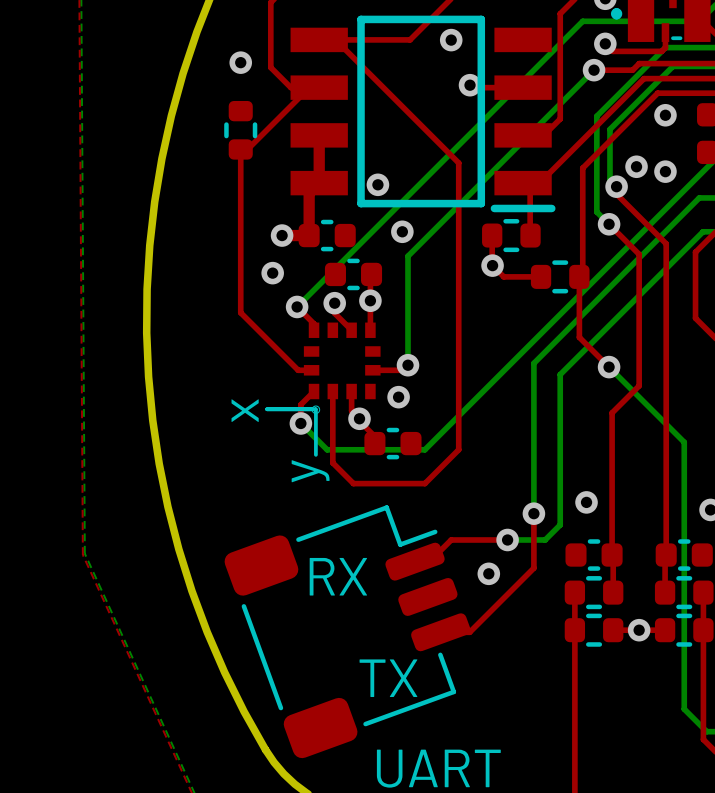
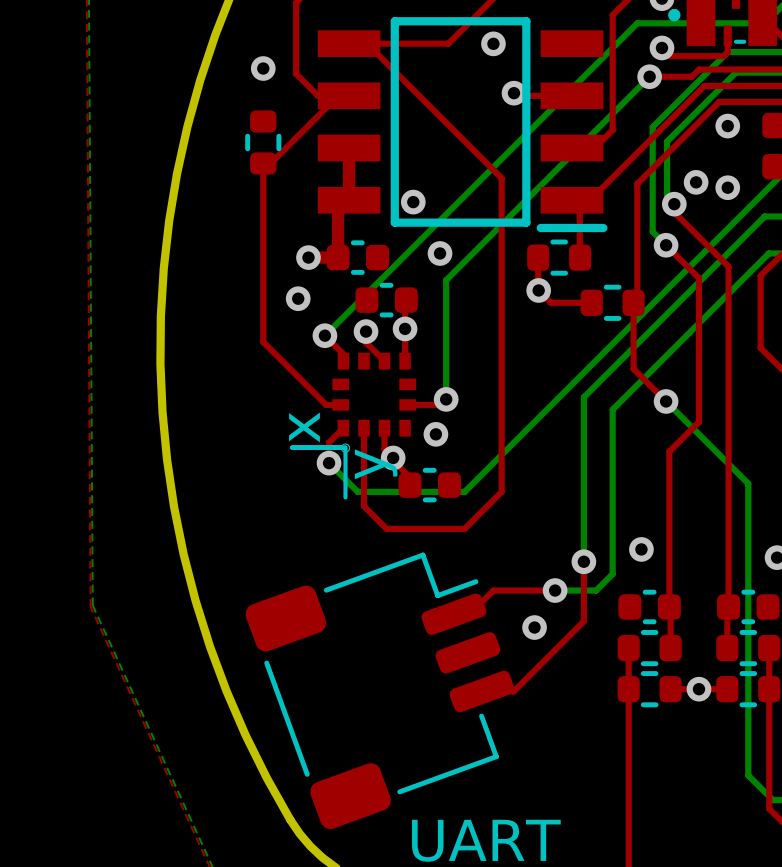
part text position: x (245, 410) -> x (304, 427)
part text position: y (310, 471) -> y (376, 464)
text: RX (338, 576) -> none
text: TX (388, 678) -> none

